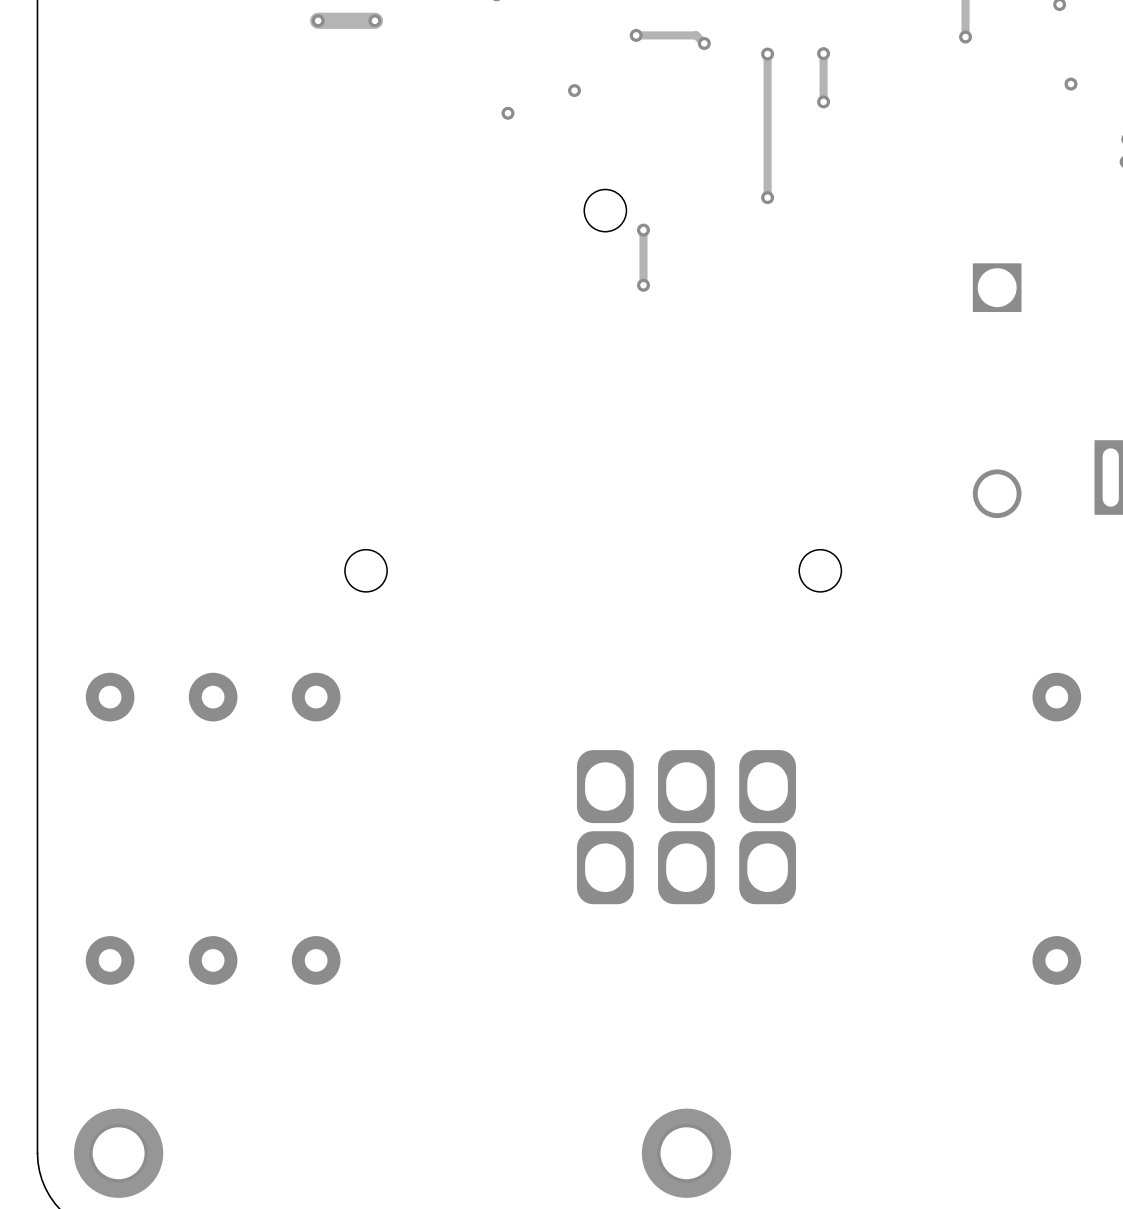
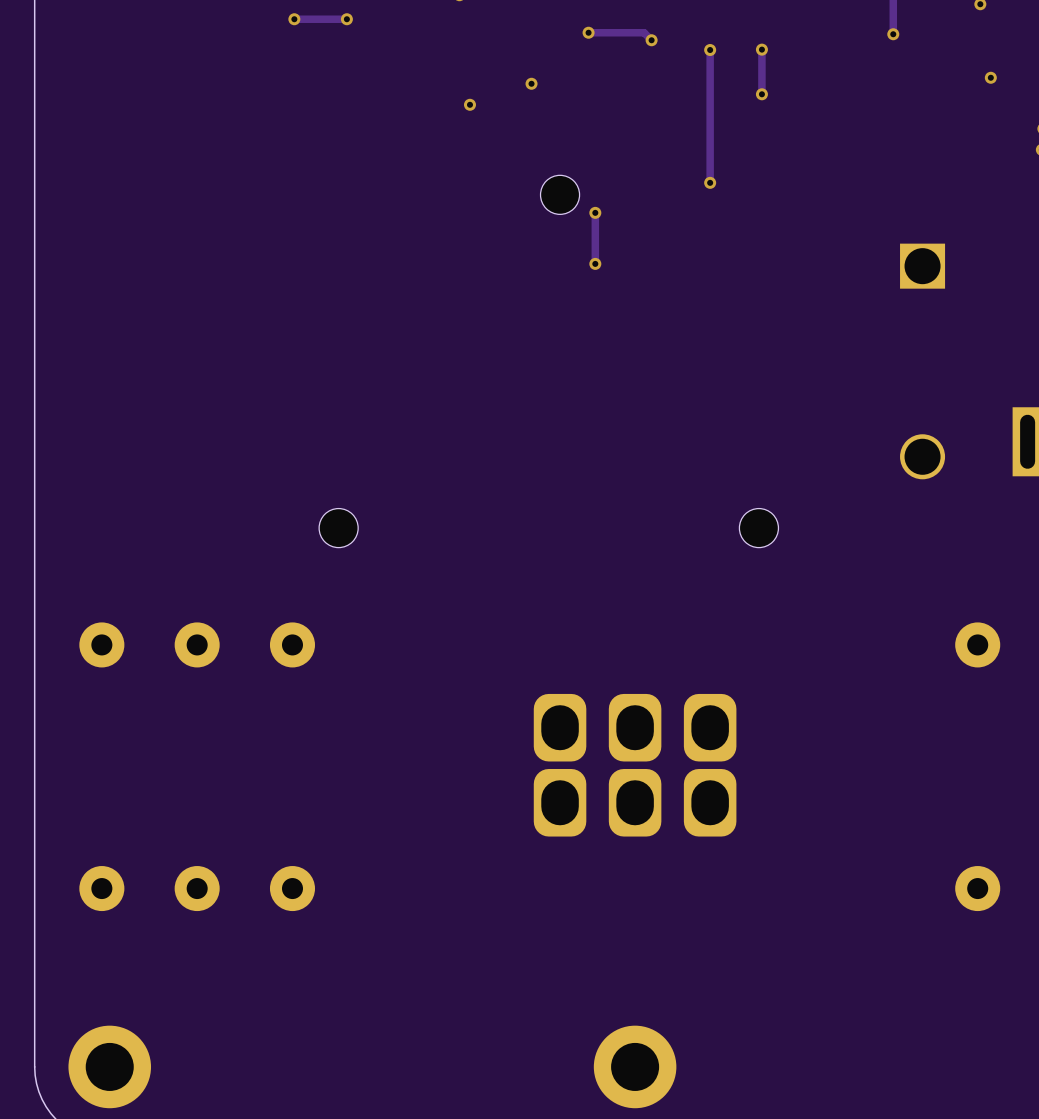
track width: thick (374, 20) (318, 20) -> thin (346, 19) (294, 19)

